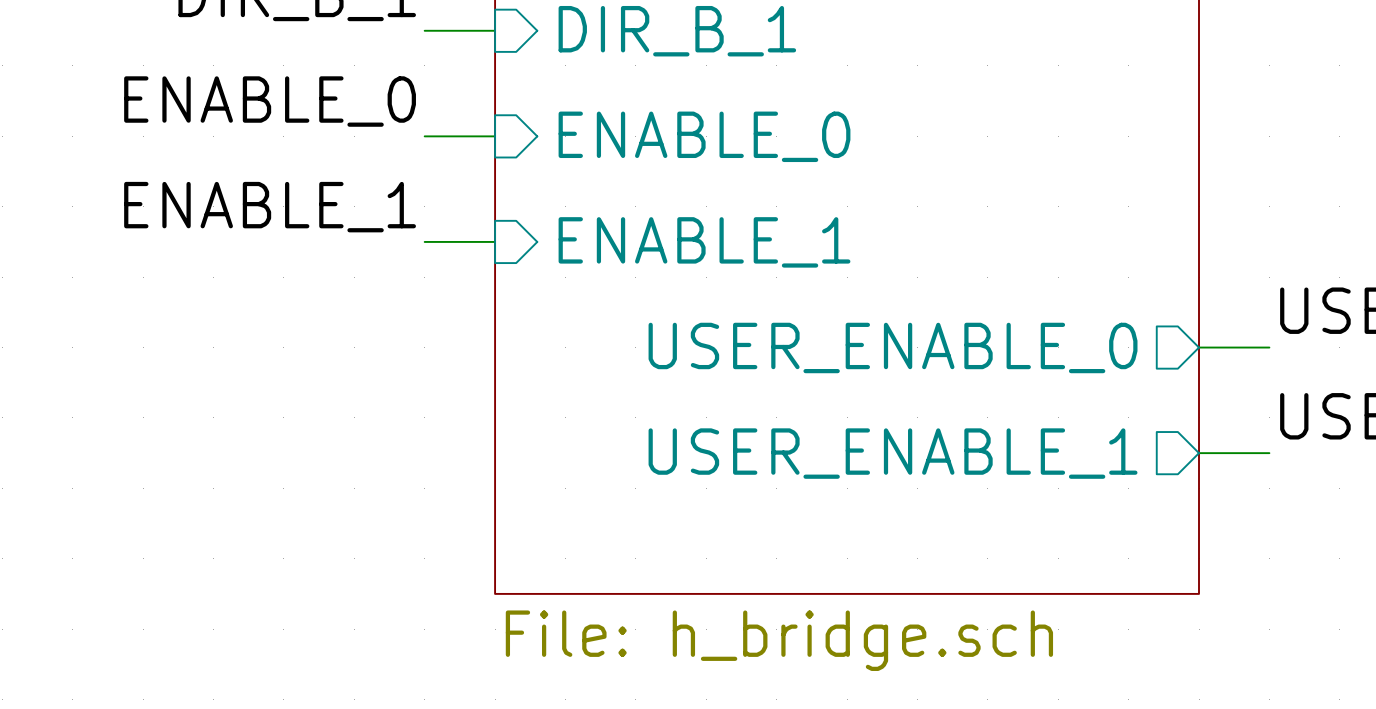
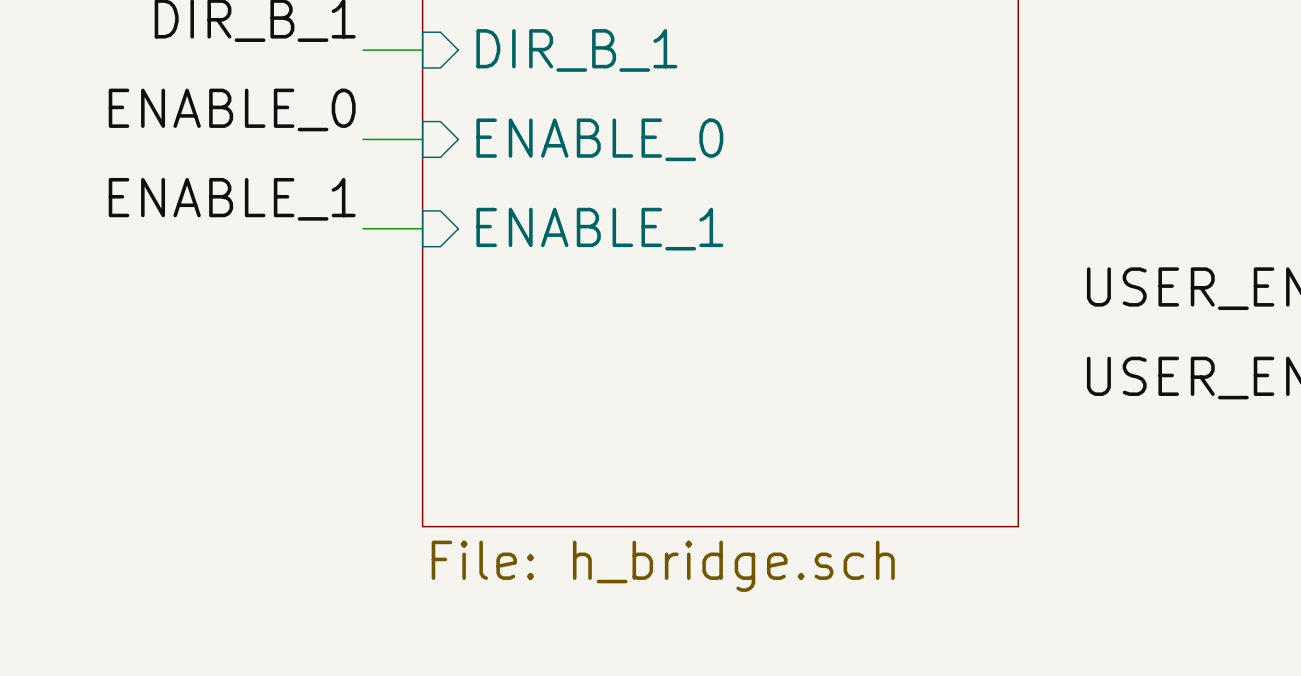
sheet pin: USER_ENABLE_0 (893, 347) -> none
wire: (1199, 347) (1269, 347) -> none
sheet pin: USER_ENABLE_1 (893, 453) -> none
wire: (1199, 453) (1269, 453) -> none

